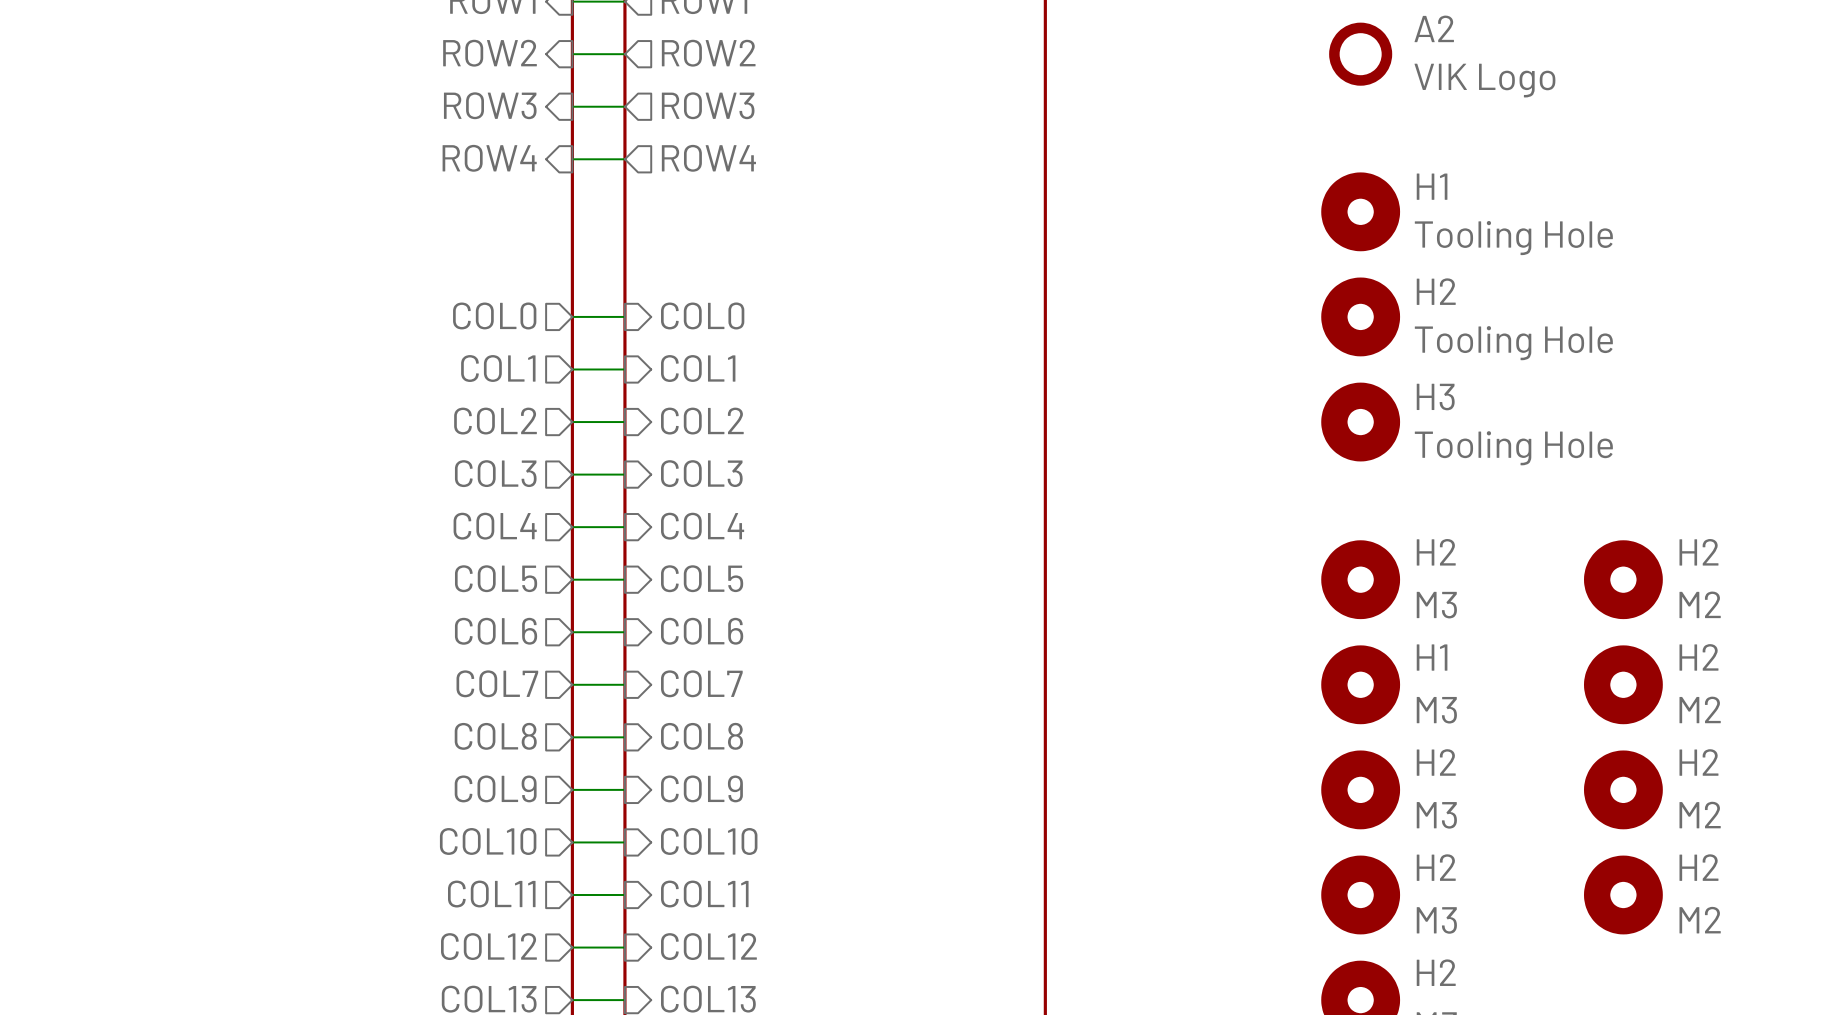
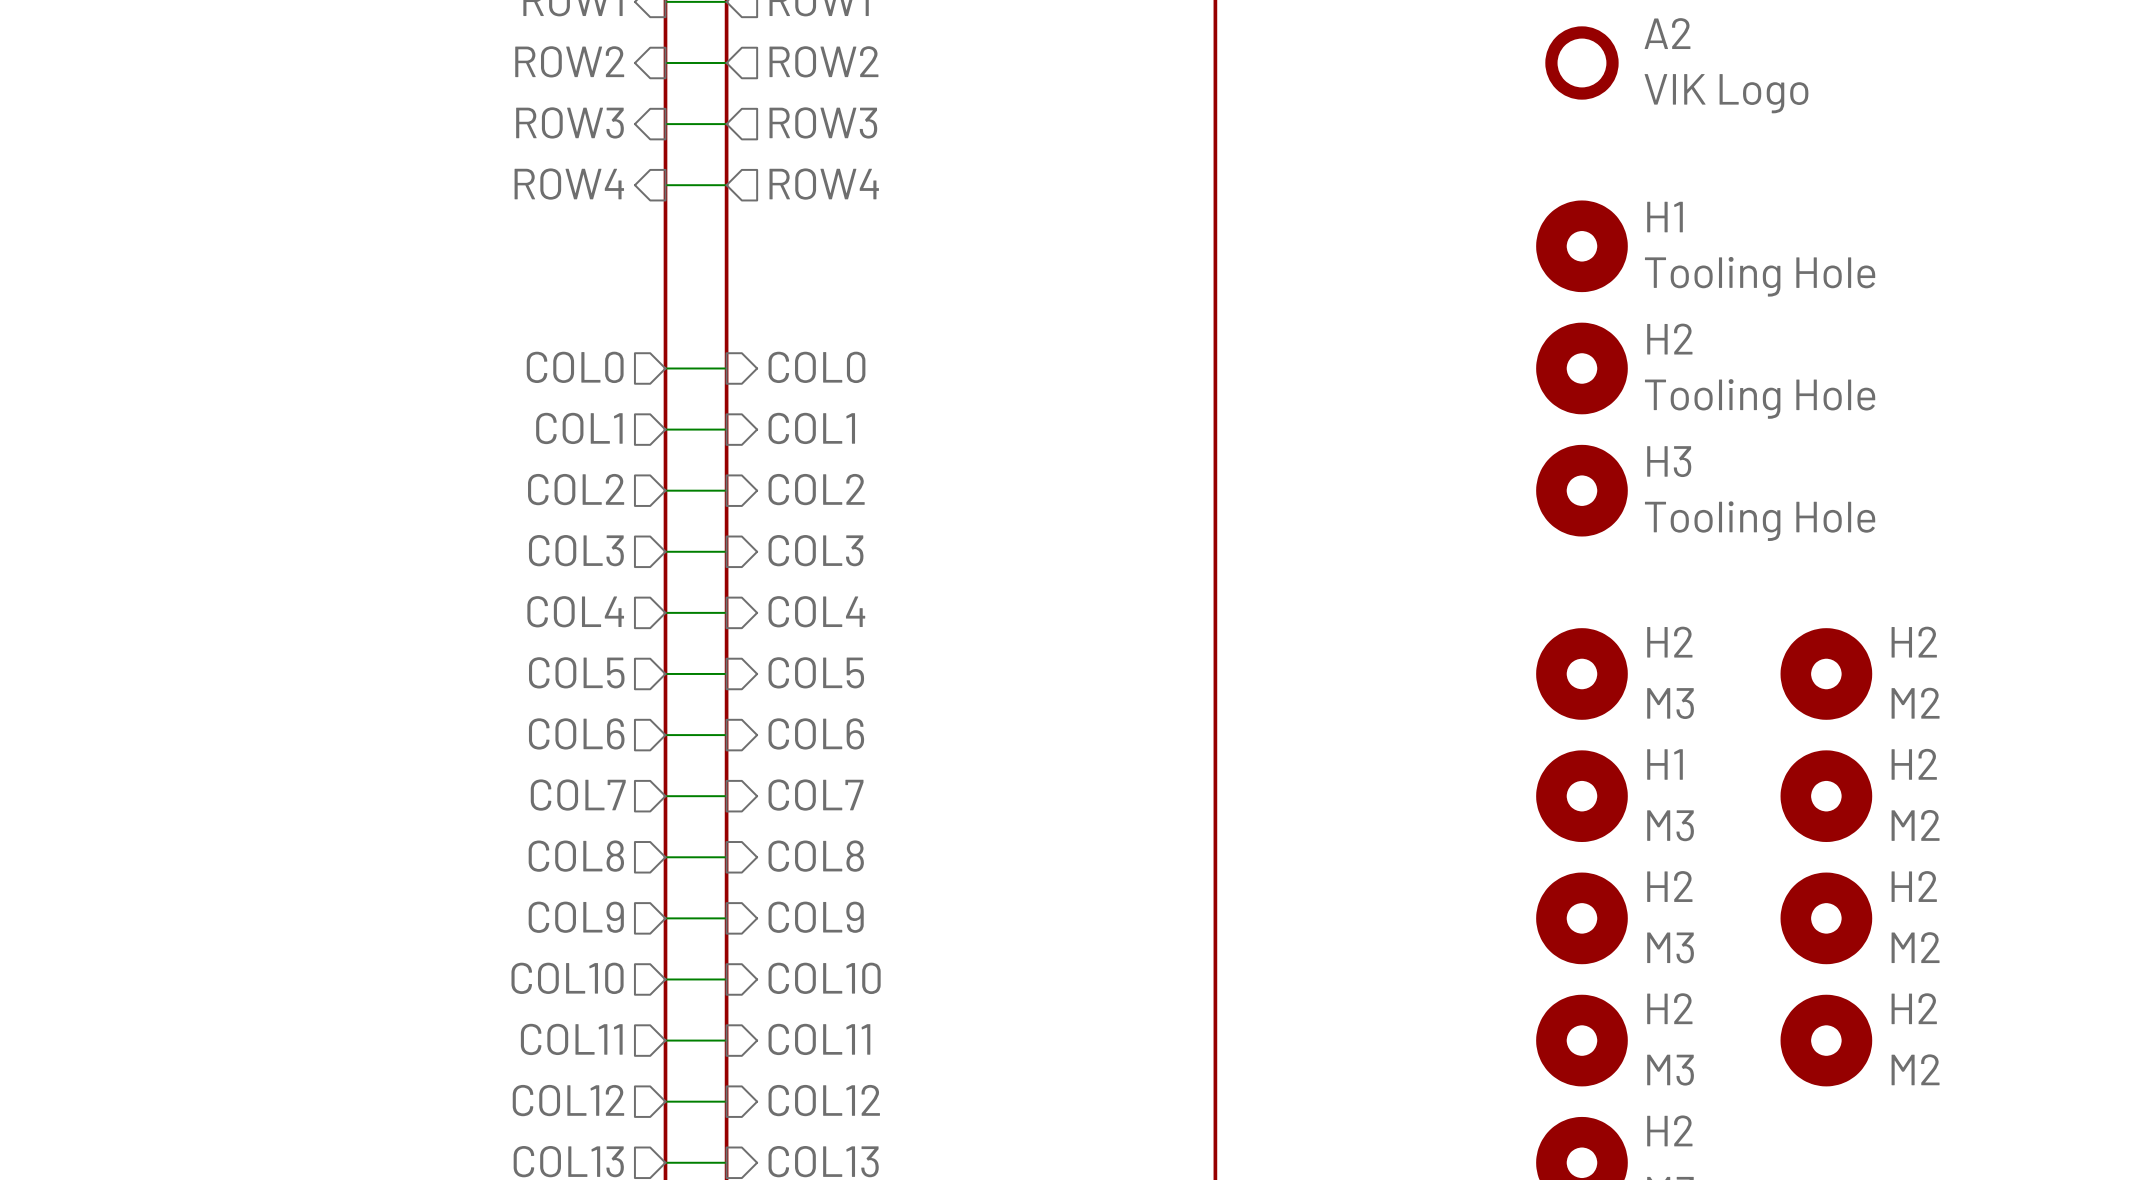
H2 position: (1623, 579) -> (1826, 673)
H2 position: (1623, 684) -> (1826, 796)
H2 position: (1623, 789) -> (1826, 918)
H2 position: (1623, 894) -> (1826, 1040)

